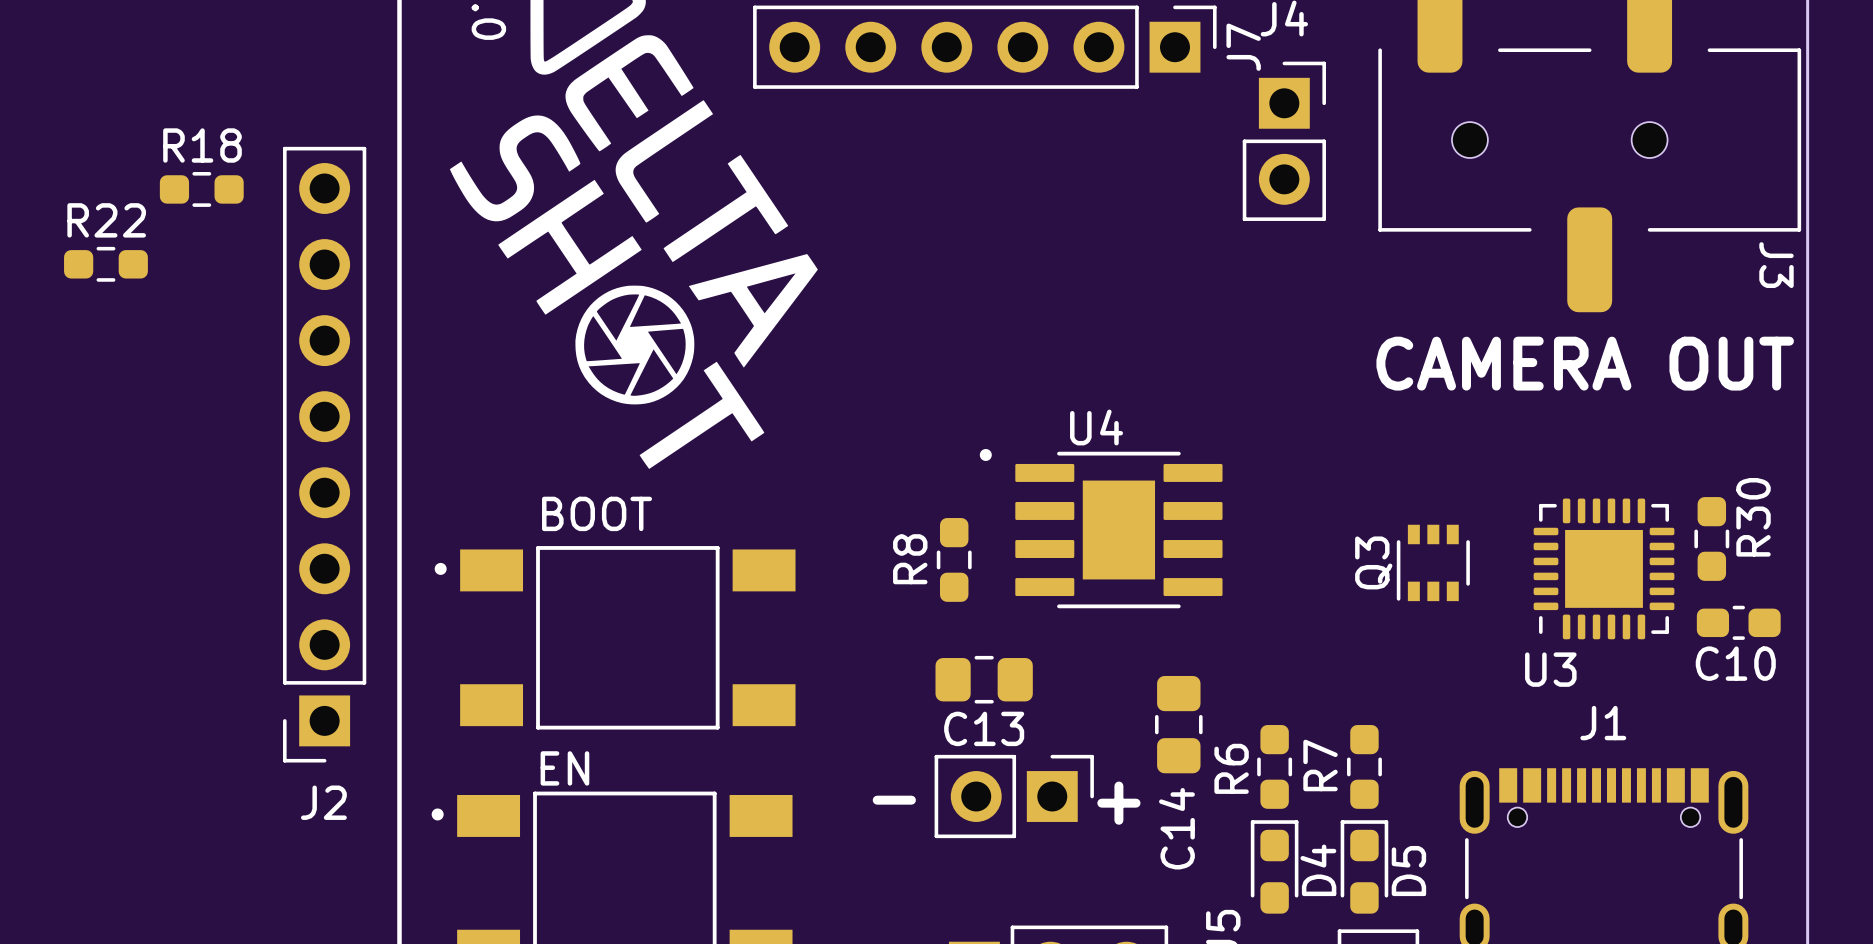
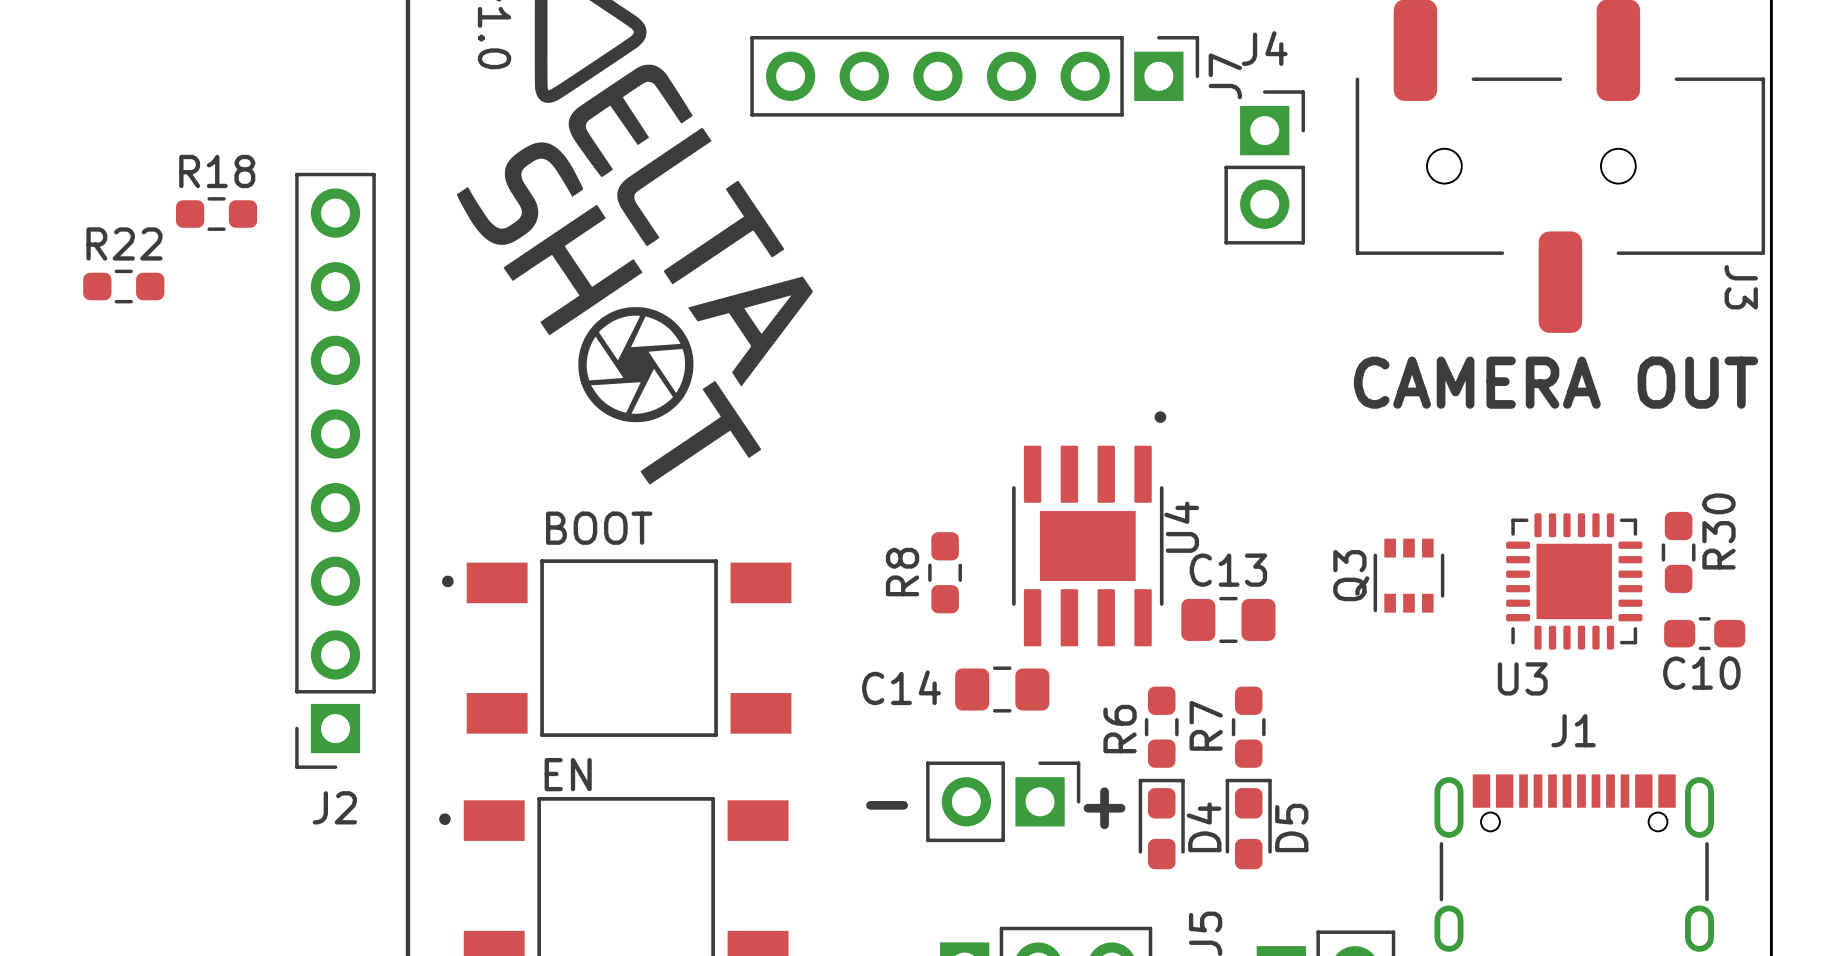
U4 rotation: 0° (1101, 528) -> 90° clockwise (1089, 528)
C13 position: (984, 679) -> (1228, 619)
C14 rotation: 0° (1178, 724) -> 90° clockwise (1002, 689)
C14 position: (1178, 724) -> (1002, 689)
C13 name position: C13 (984, 728) -> C13 (1228, 570)
R6 position: (1274, 766) -> (1161, 727)
R7 position: (1364, 766) -> (1248, 727)
D4 position: (1274, 866) -> (1161, 824)
D5 position: (1364, 866) -> (1248, 824)

